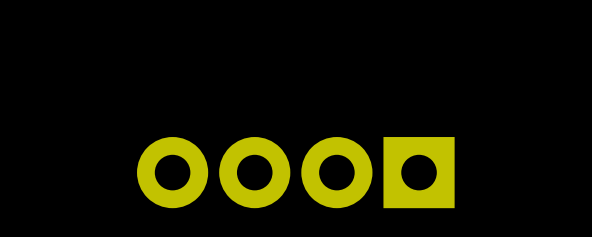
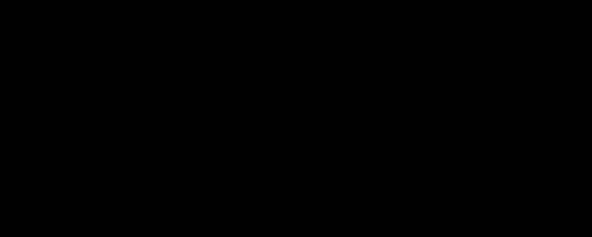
part: (295, 172) -> none

